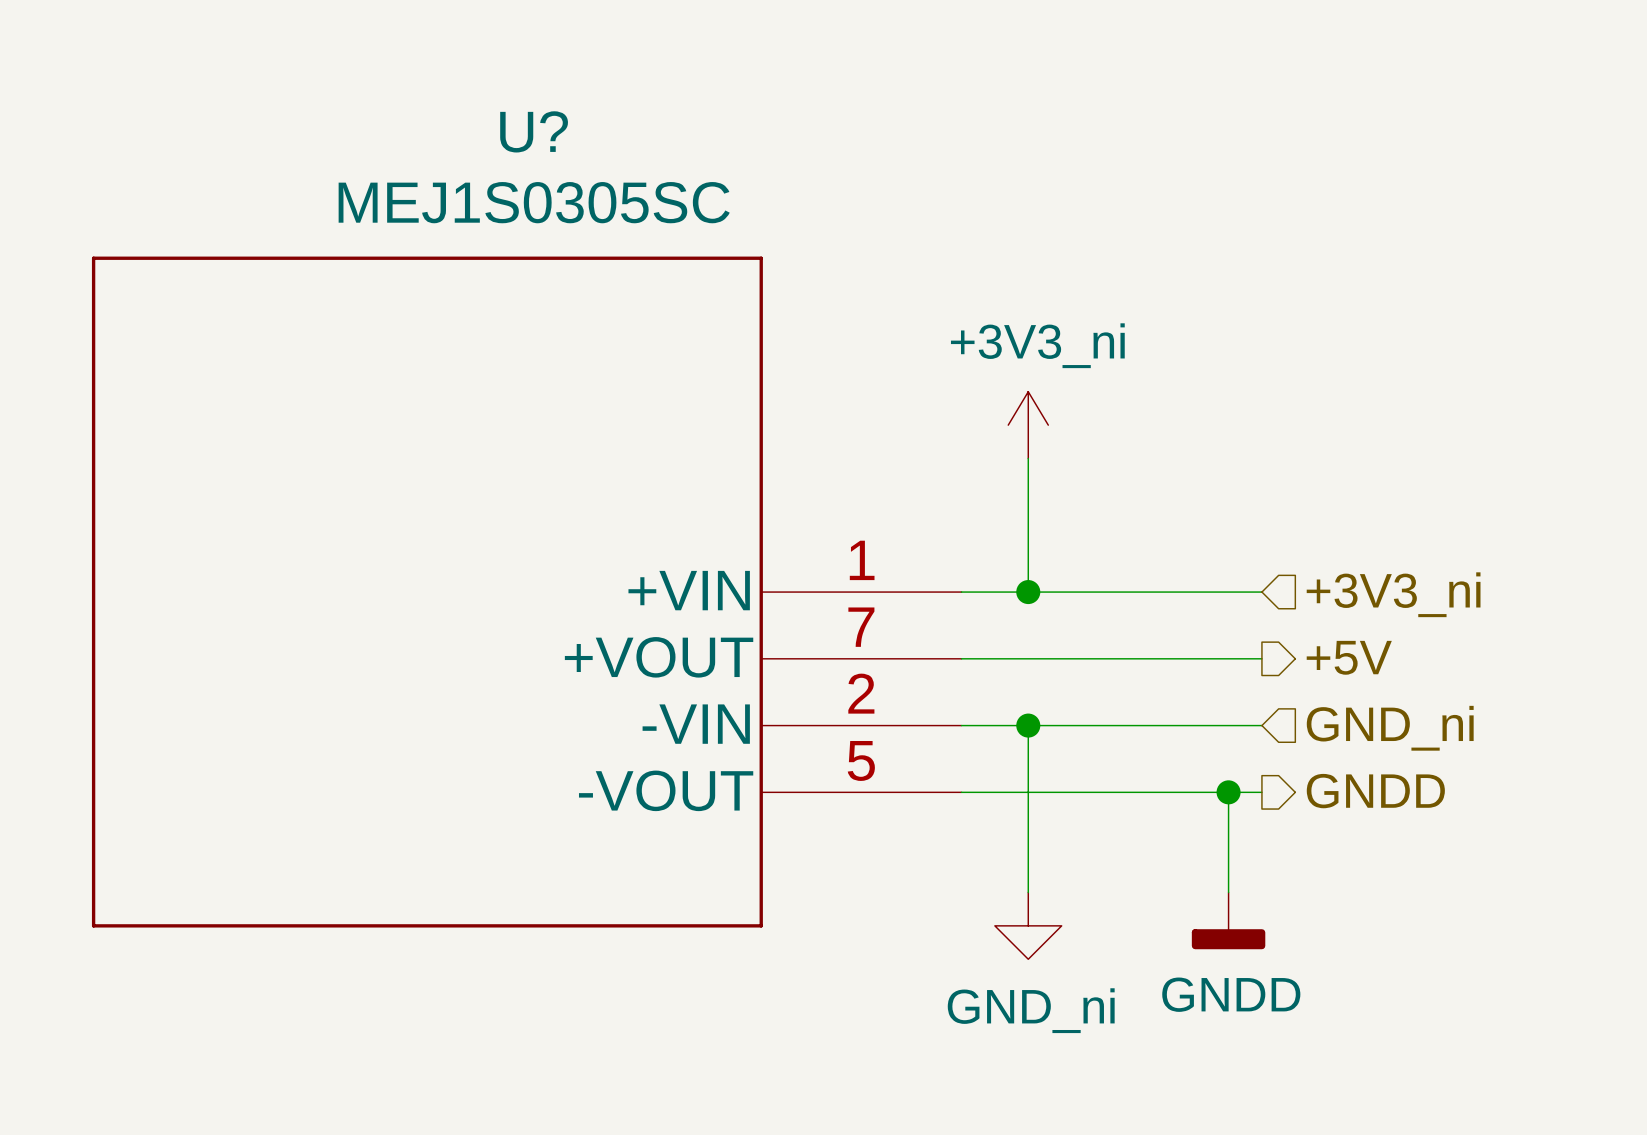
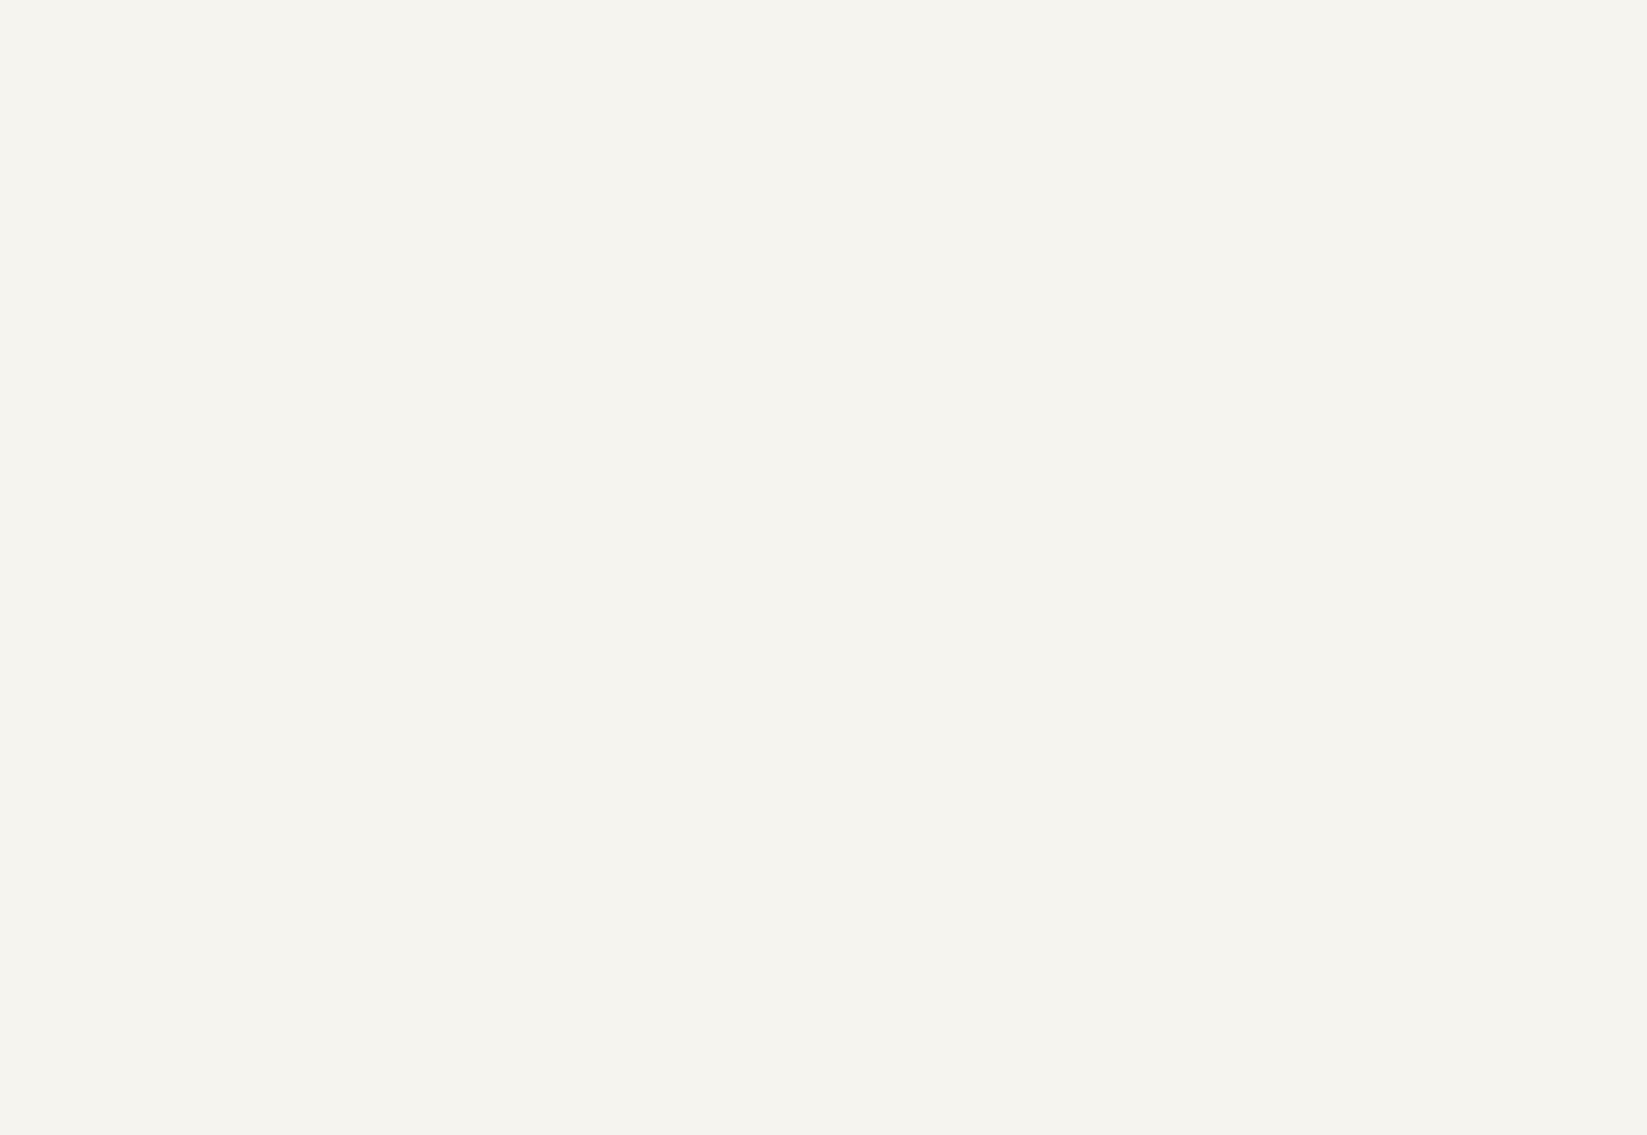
power symbol: +3V3_ni (1028, 425) -> none
wire: (1028, 458) (1028, 592) -> none
U?: MEJ1S0305SC (526, 592) -> none
wire: (961, 592) (1261, 592) -> none
junction: (1028, 592) -> none
hierarchical label: +3V3_ni (1393, 594) -> none
hierarchical label: +5V (1349, 657) -> none
wire: (961, 658) (1261, 658) -> none
wire: (961, 725) (1261, 725) -> none
wire: (1028, 725) (1028, 892) -> none
junction: (1028, 725) -> none
hierarchical label: GND_ni (1390, 728) -> none
hierarchical label: GNDD (1375, 791) -> none
wire: (961, 792) (1261, 792) -> none
wire: (1228, 792) (1228, 892) -> none
junction: (1228, 792) -> none
power symbol: GNDD (1228, 920) -> none
power symbol: GND_ni (1028, 925) -> none

